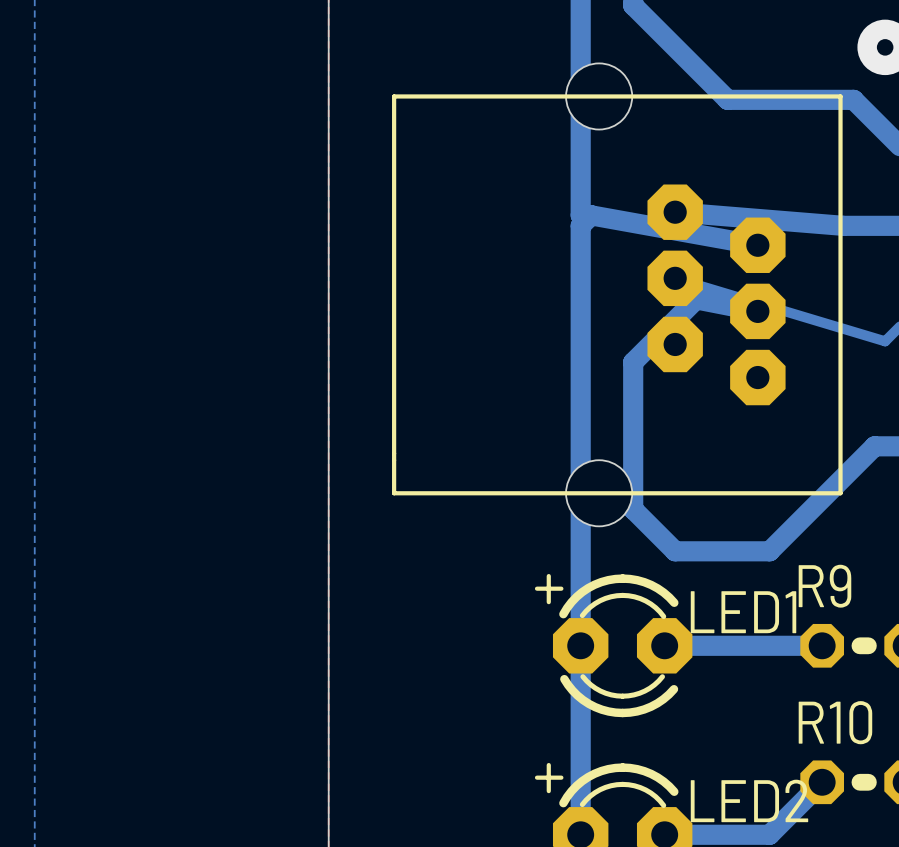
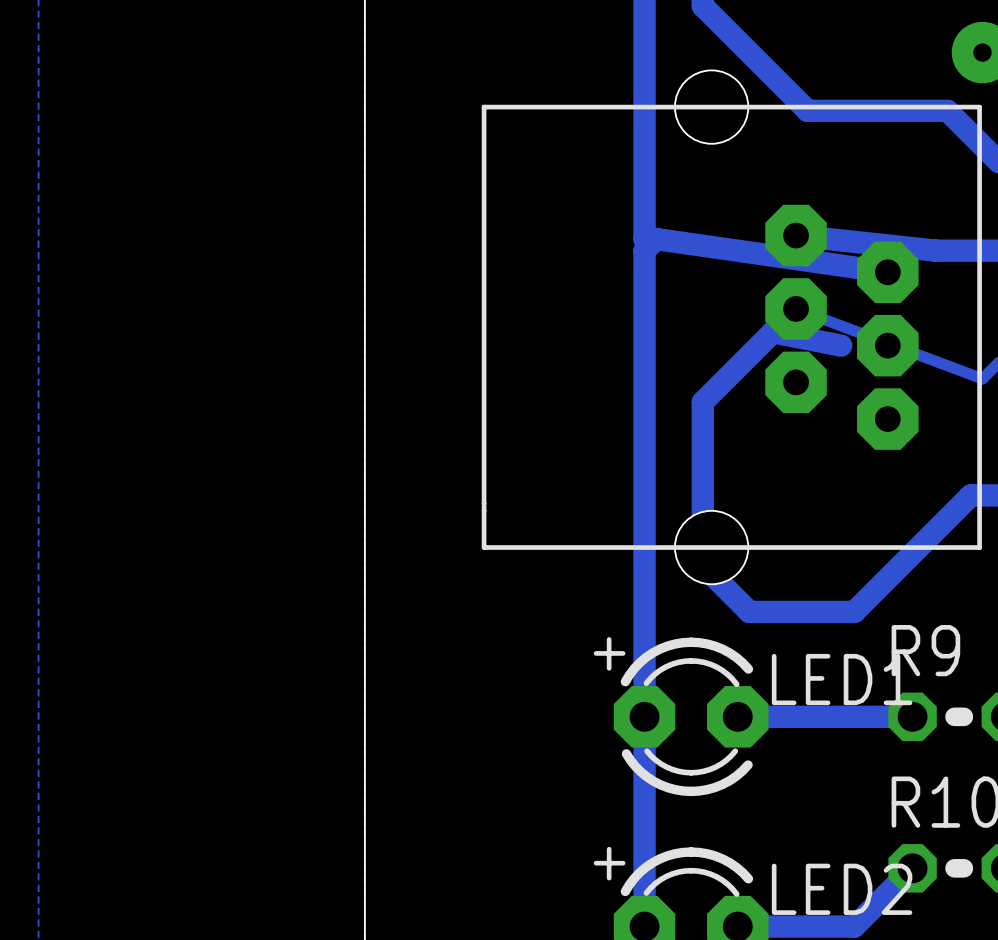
bottom track: (675, 212) (843, 225) -> (796, 235) (935, 250)
bottom track: (591, 215) (757, 245) -> (656, 239) (887, 272)
bottom track: (675, 278) (885, 341) -> (796, 308) (982, 378)
part position: (617, 294) -> (731, 327)

